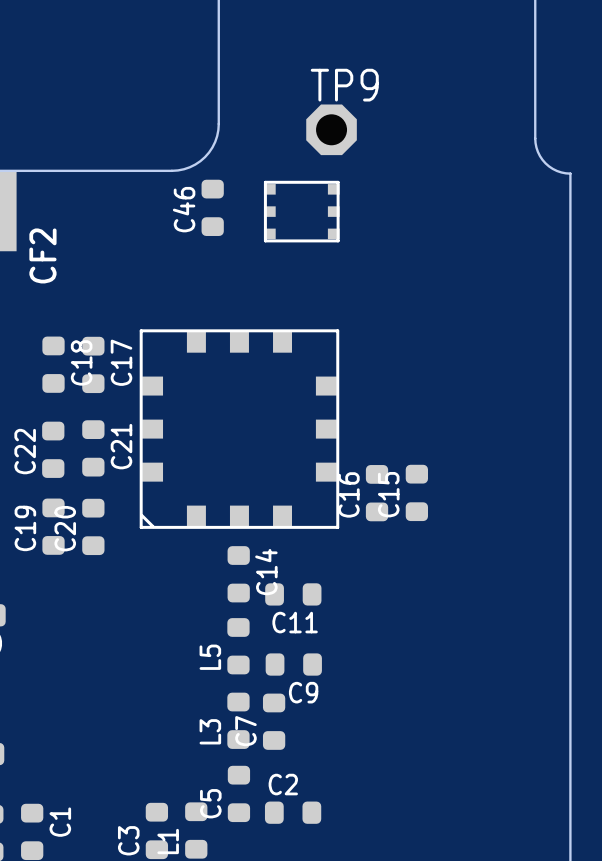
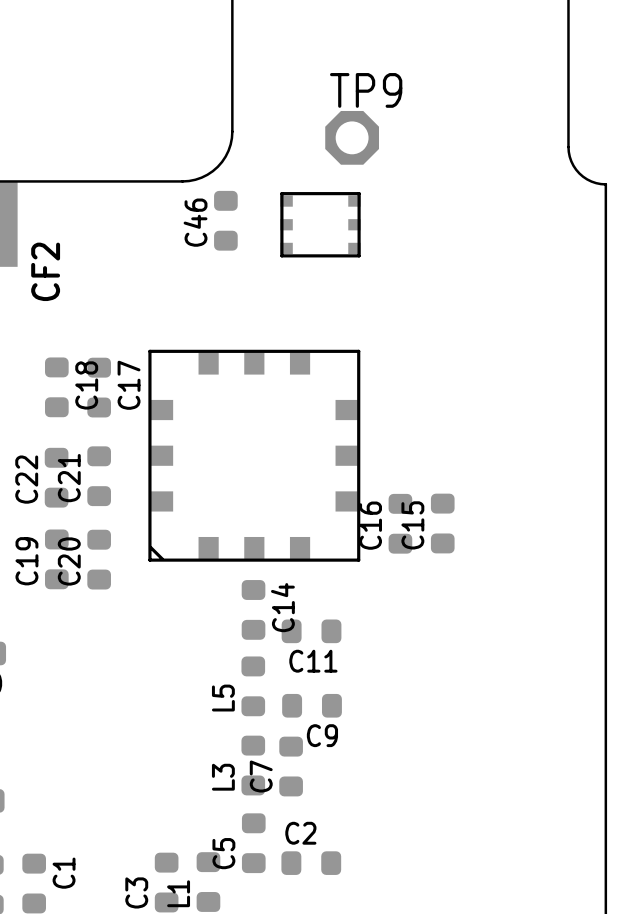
C21 name position: C21 (121, 446) -> C21 (69, 478)

